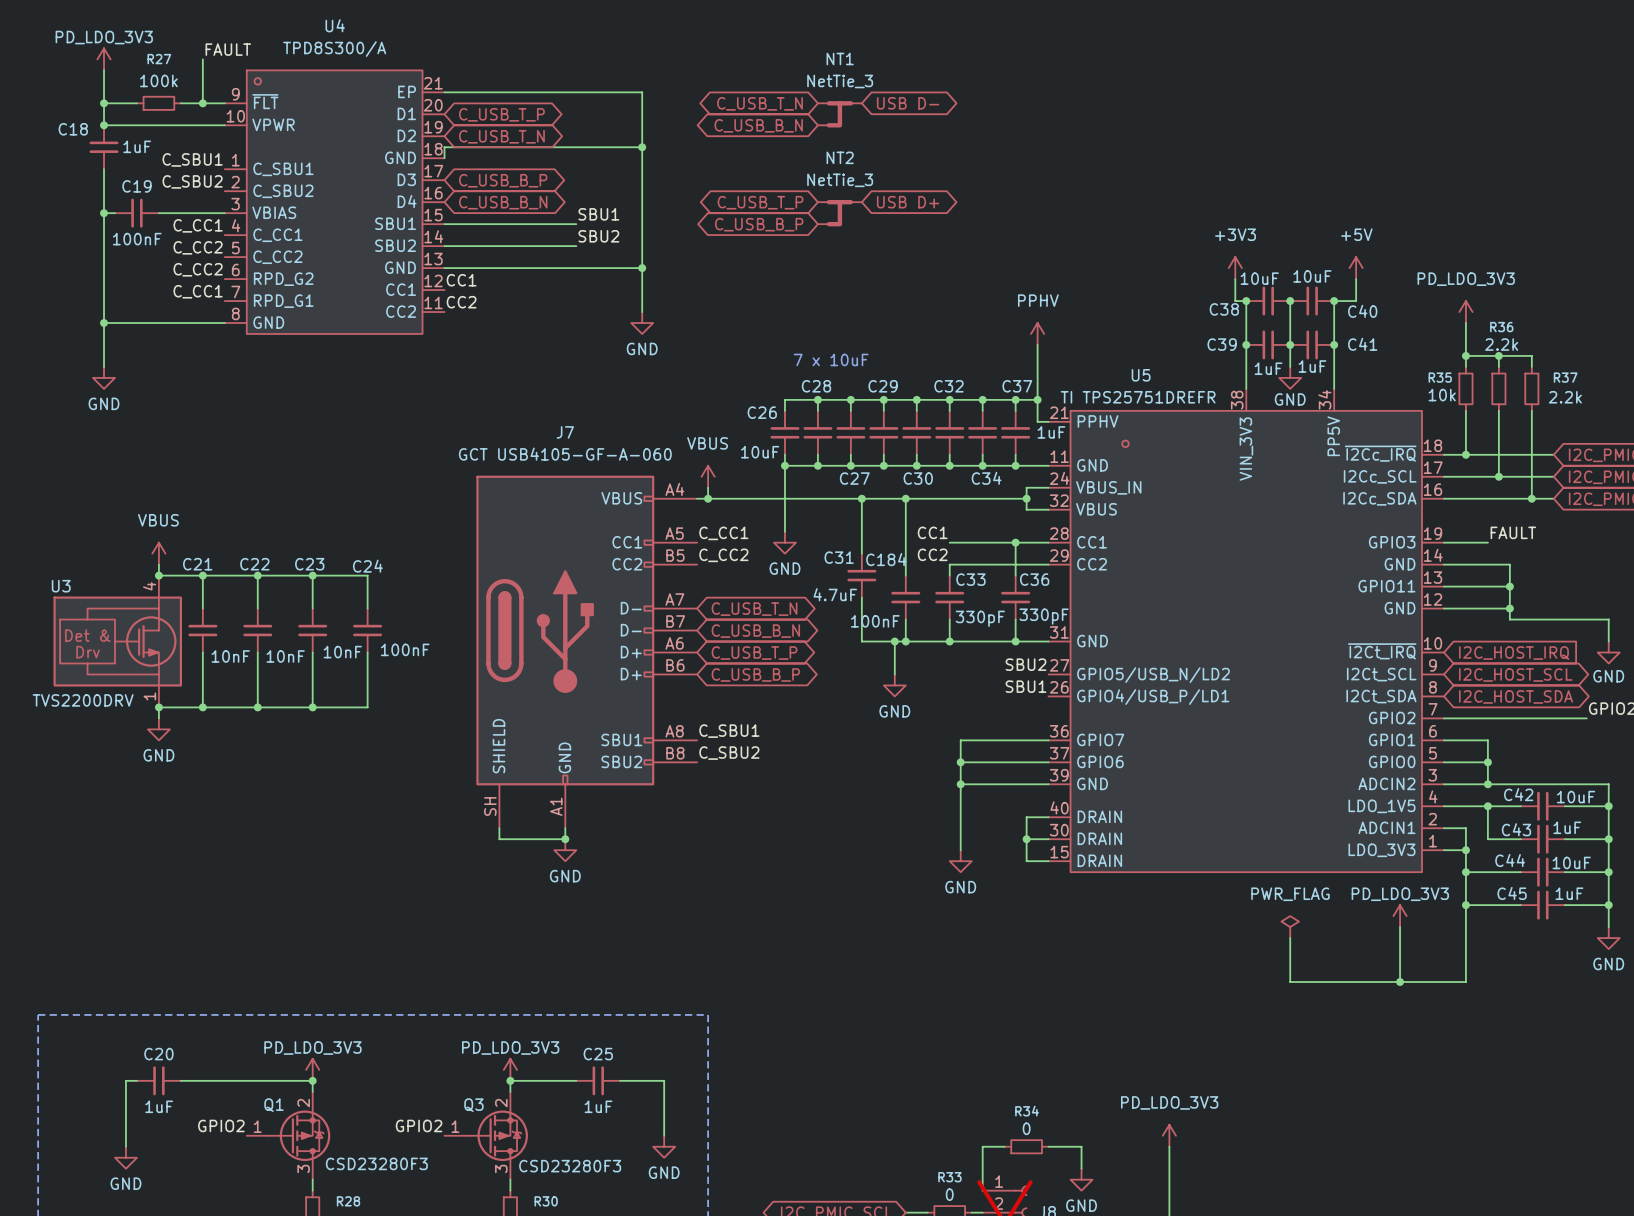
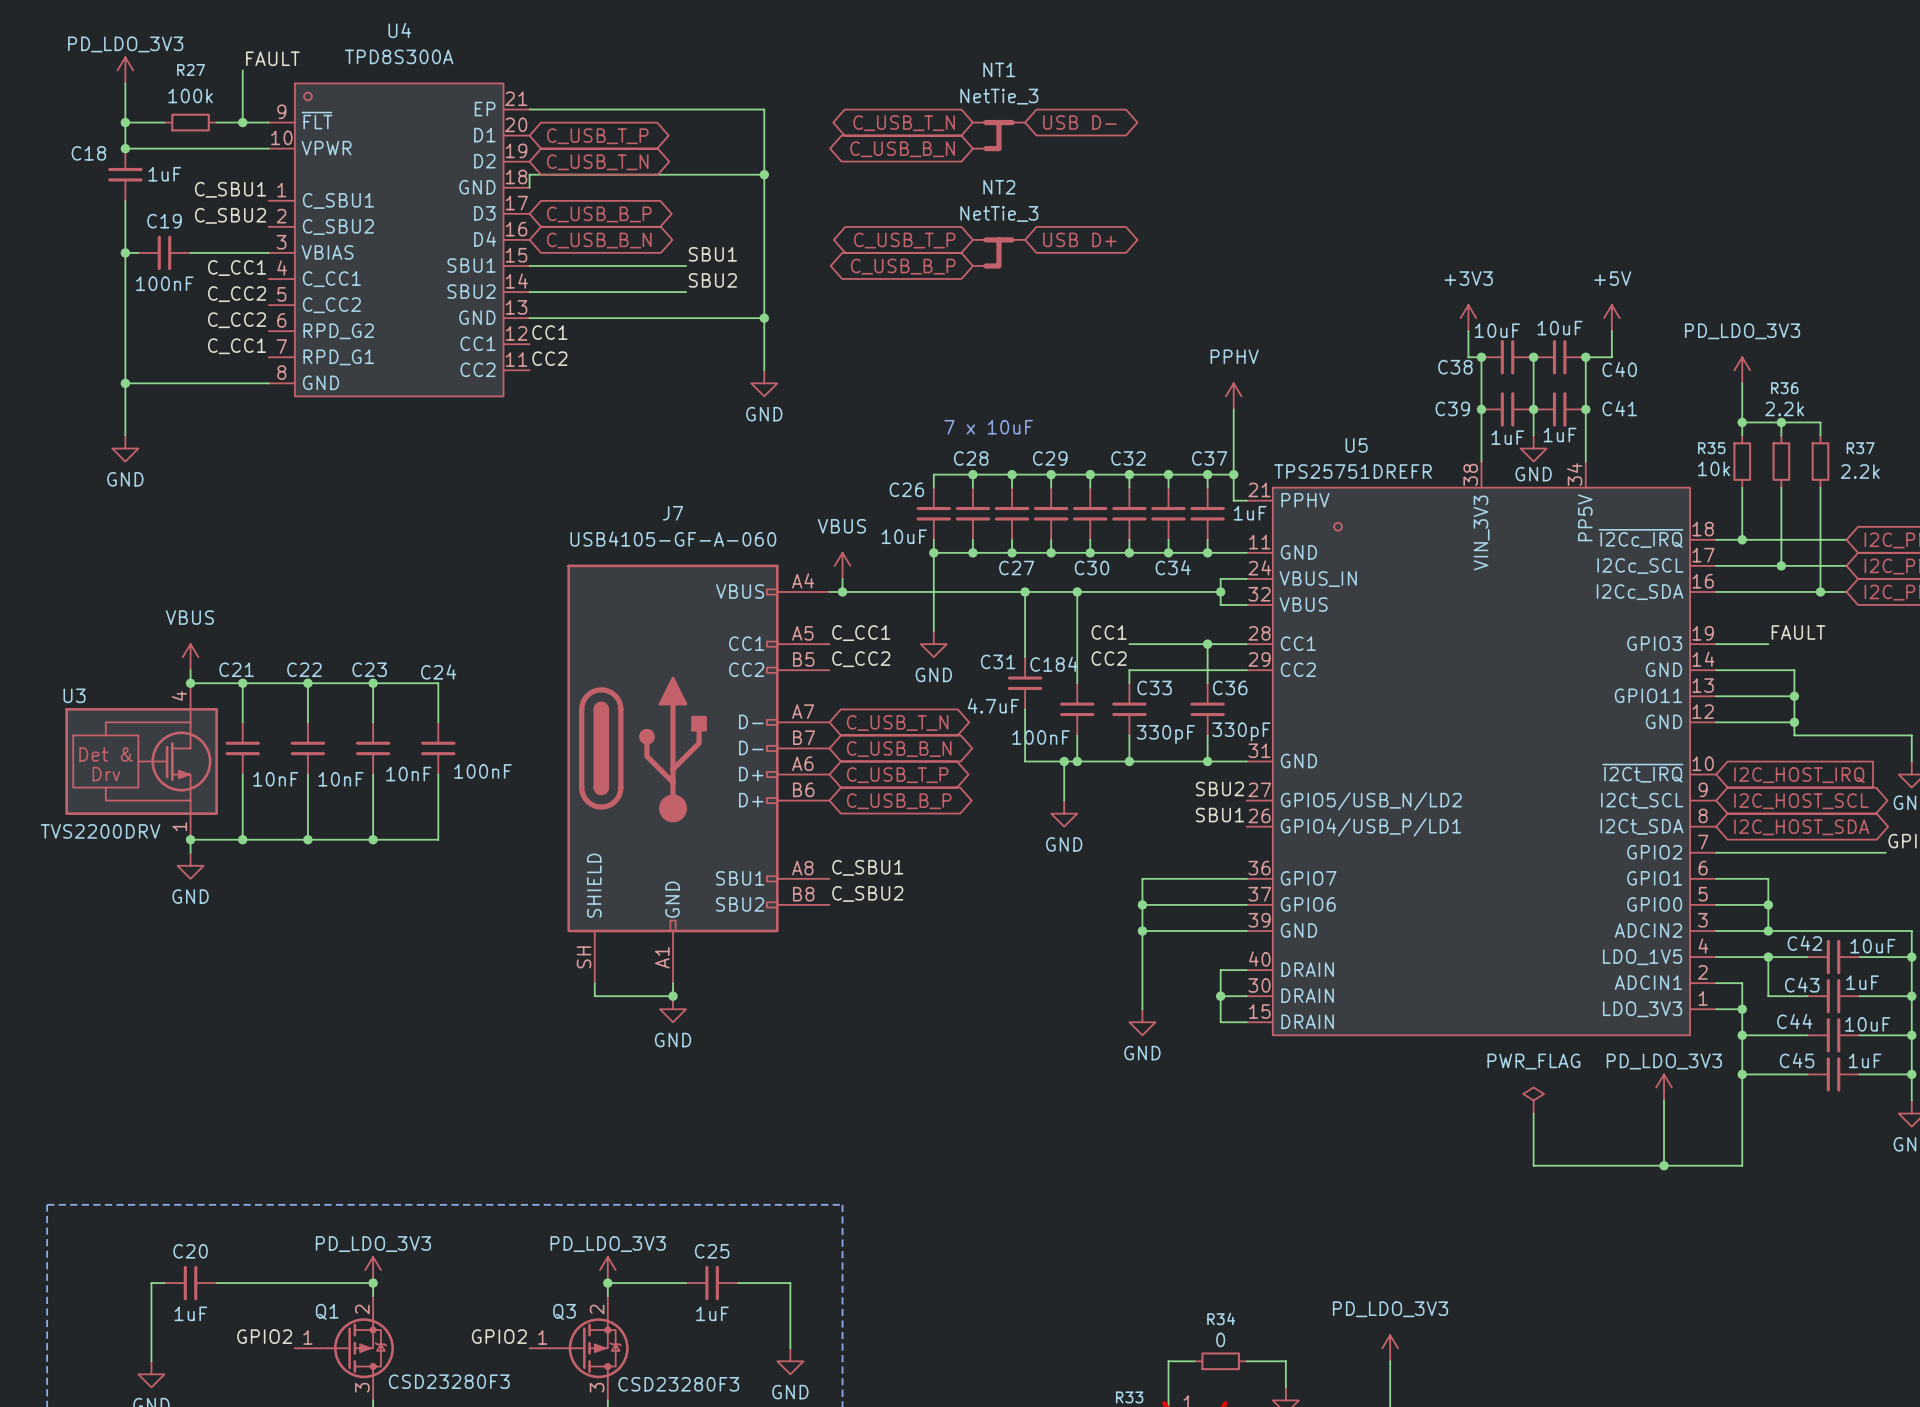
U4 value: TPD8S300/A (334, 49) -> TPD8S300A (399, 56)
U5 value: TI TPS25751DREFR (1138, 397) -> TPS25751DREFR (1353, 471)
J7 value: GCT USB4105-GF-A-060 (565, 454) -> USB4105-GF-A-060 (673, 539)

